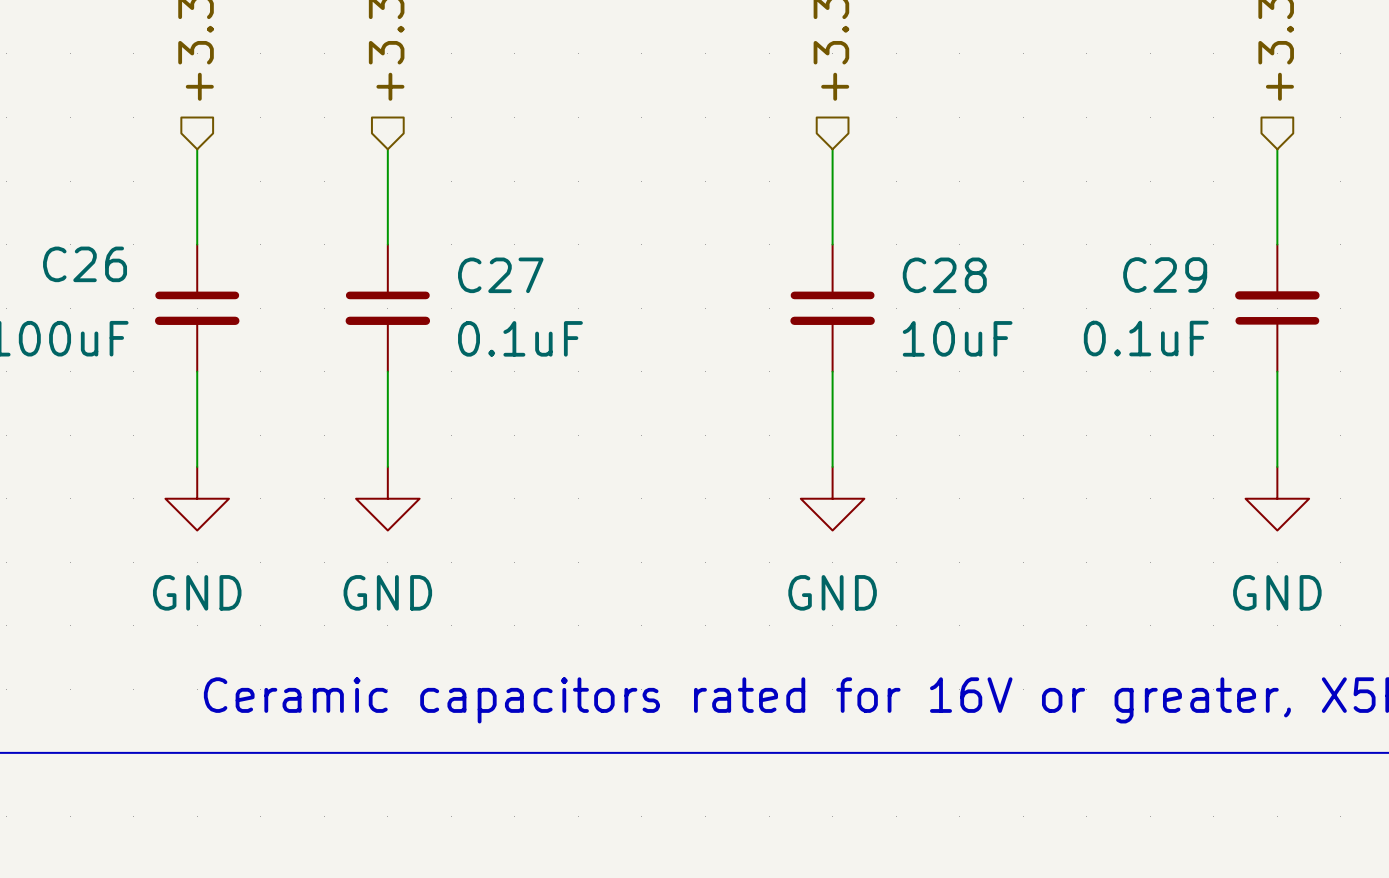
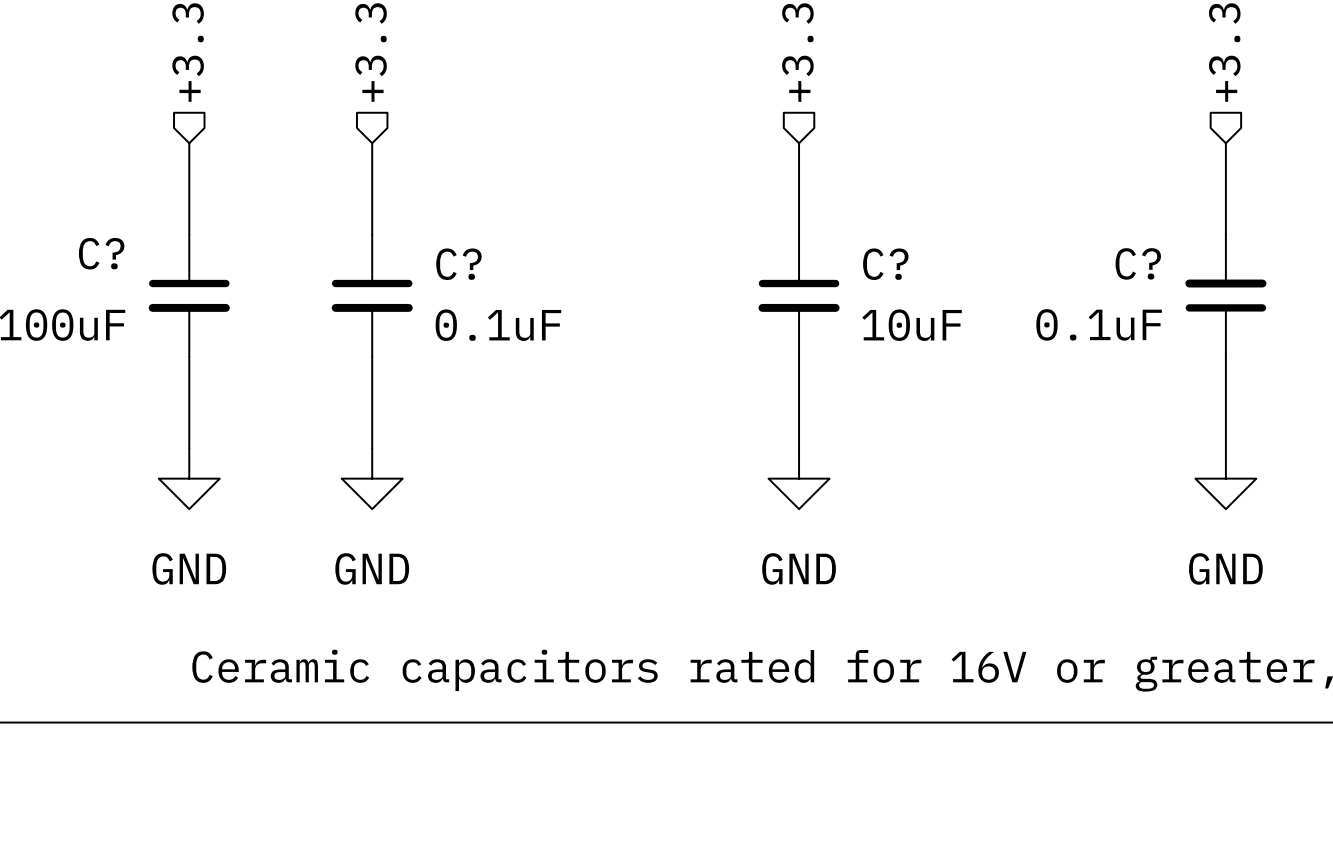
C26 name: C26 (85, 264) -> C? (101, 253)
C27 name: C27 (500, 275) -> C? (458, 264)
C28 name: C28 (944, 275) -> C? (885, 264)
C29 name: C29 (1165, 275) -> C? (1138, 263)

